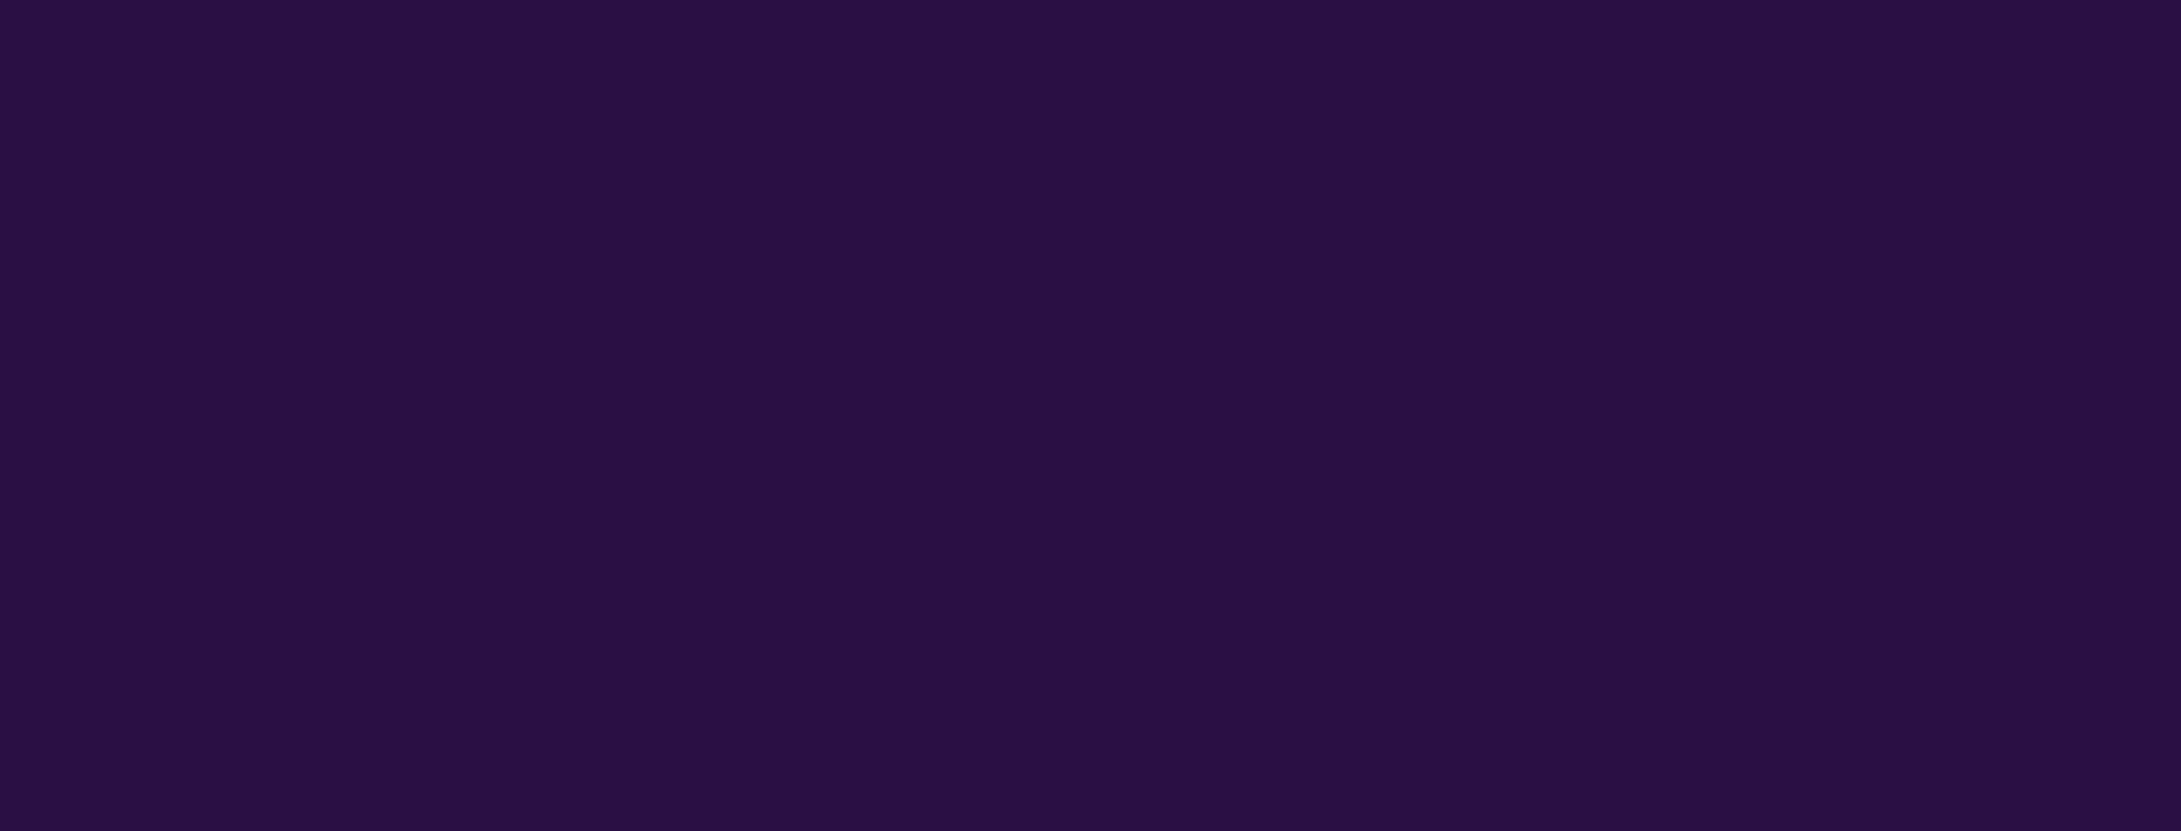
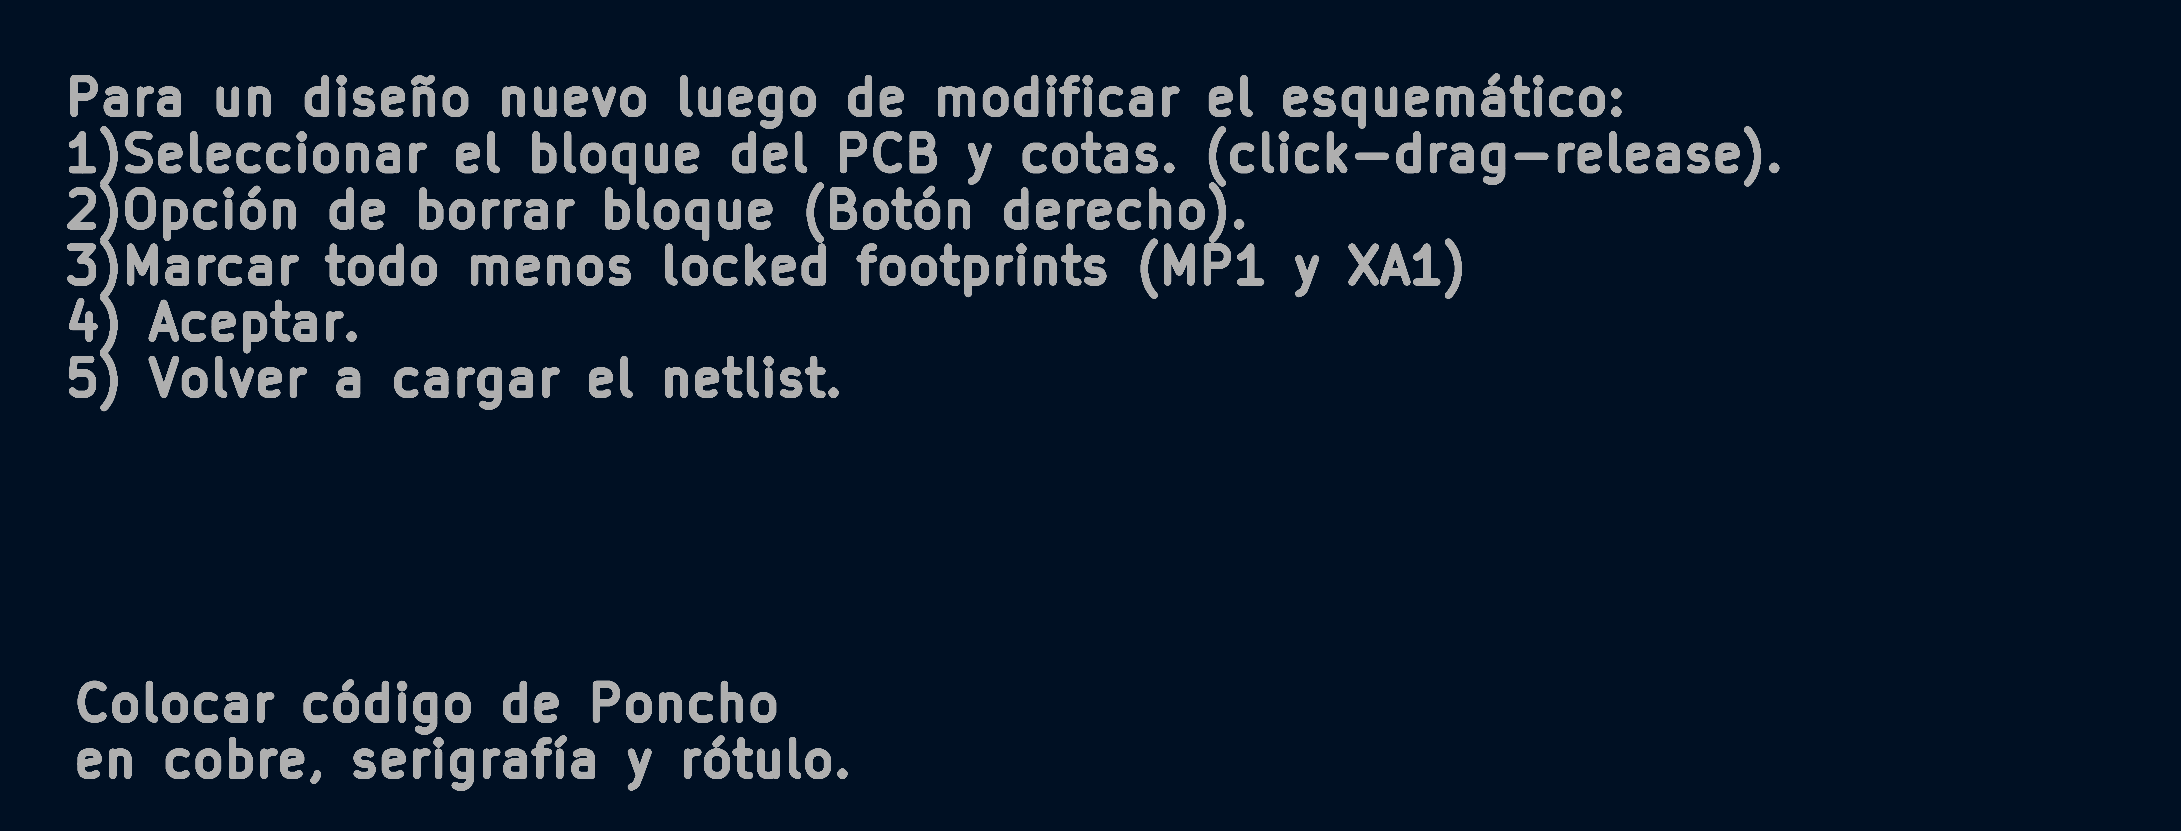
text: none -> Para un diseño nuevo luego de modificar el esquemático: (846, 100)
text: none -> 1)Seleccionar el bloque del PCB y cotas. (click-drag-release). (924, 156)
text: none -> 2)Opción de borrar bloque (Botón derecho). (655, 212)
text: none -> 3)Marcar todo menos locked footprints (MP1 y XA1) (764, 268)
text: none -> 4) Aceptar. (212, 324)
text: none -> 5) Volver a cargar el netlist. (453, 381)
text: none -> Colocar código de Poncho (426, 706)
text: none -> en cobre, serigrafía y rótulo. (462, 762)

